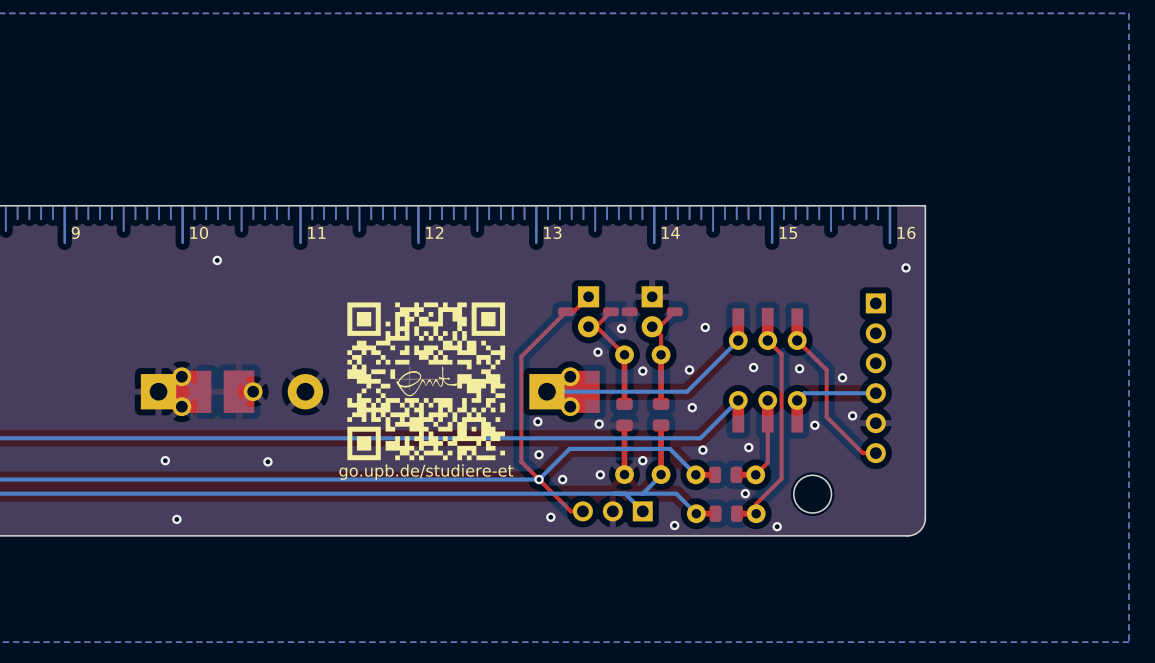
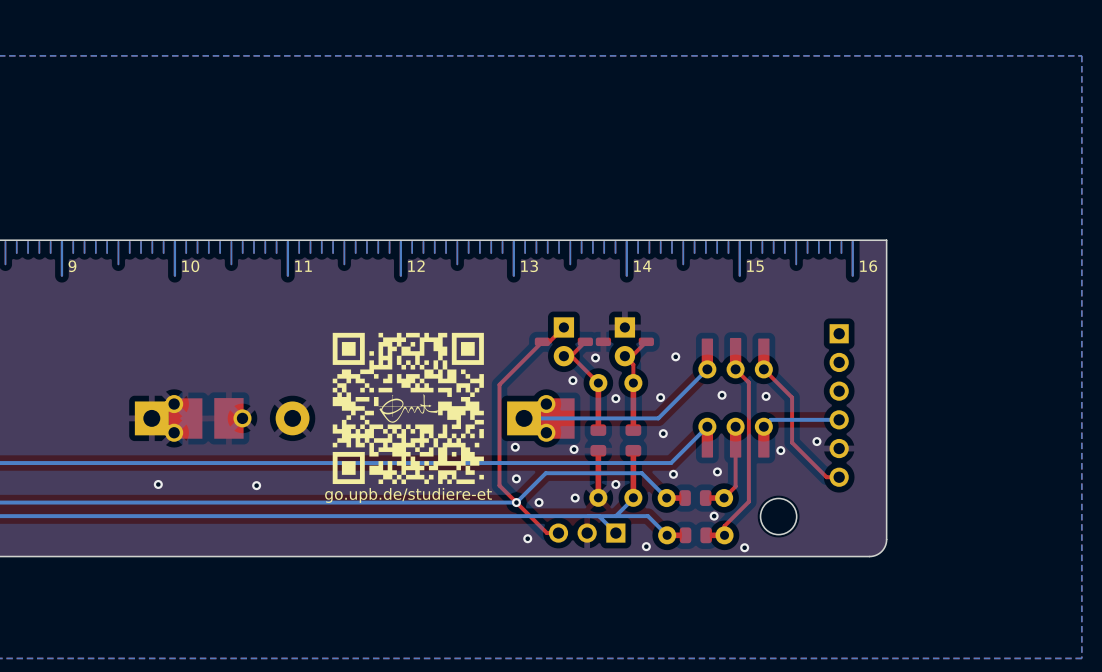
via: (217, 260) -> none
via: (906, 267) -> none
via: (842, 377) -> none
via: (176, 519) -> none

